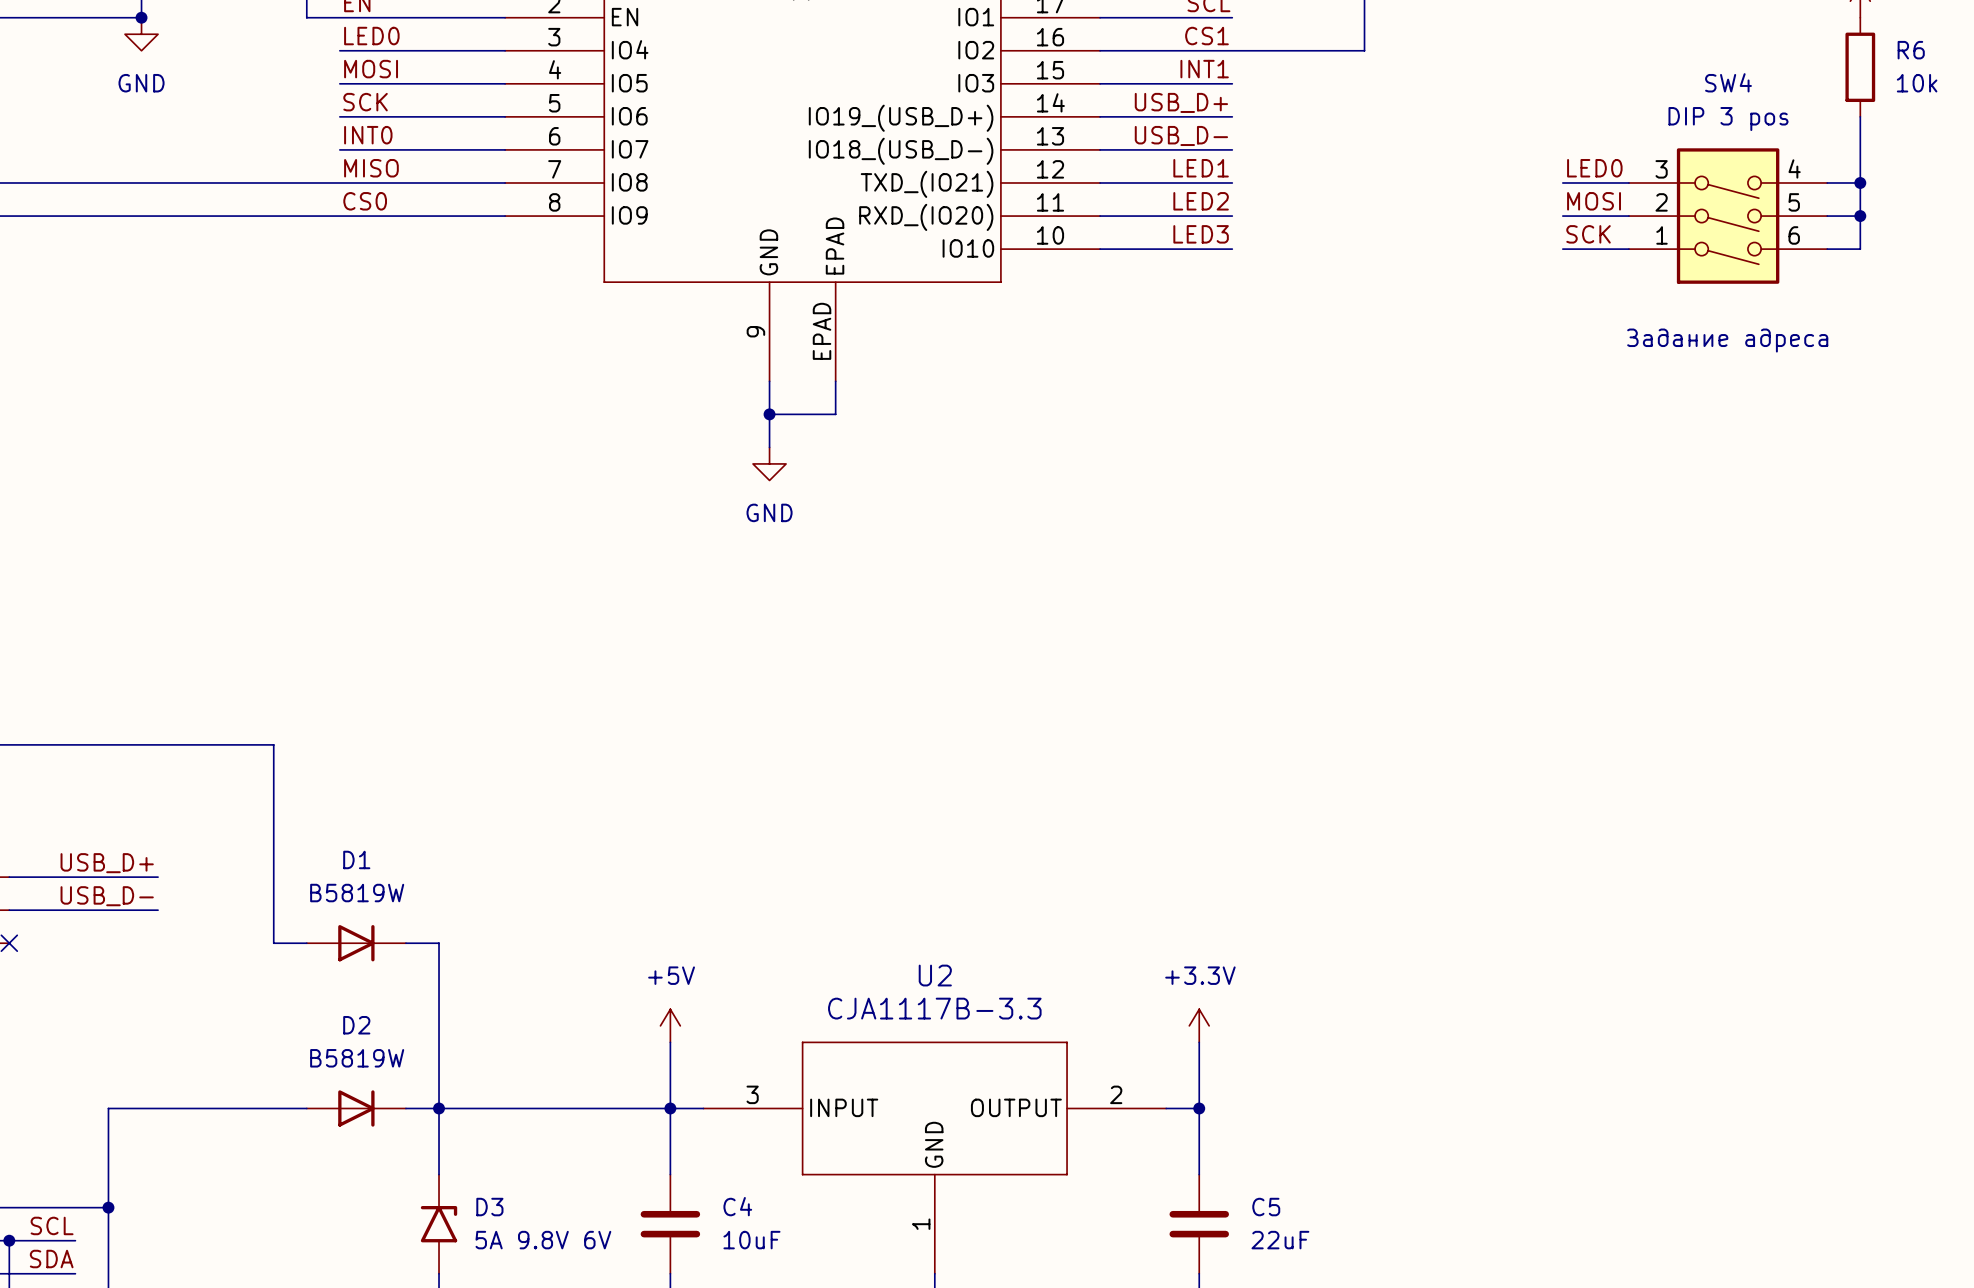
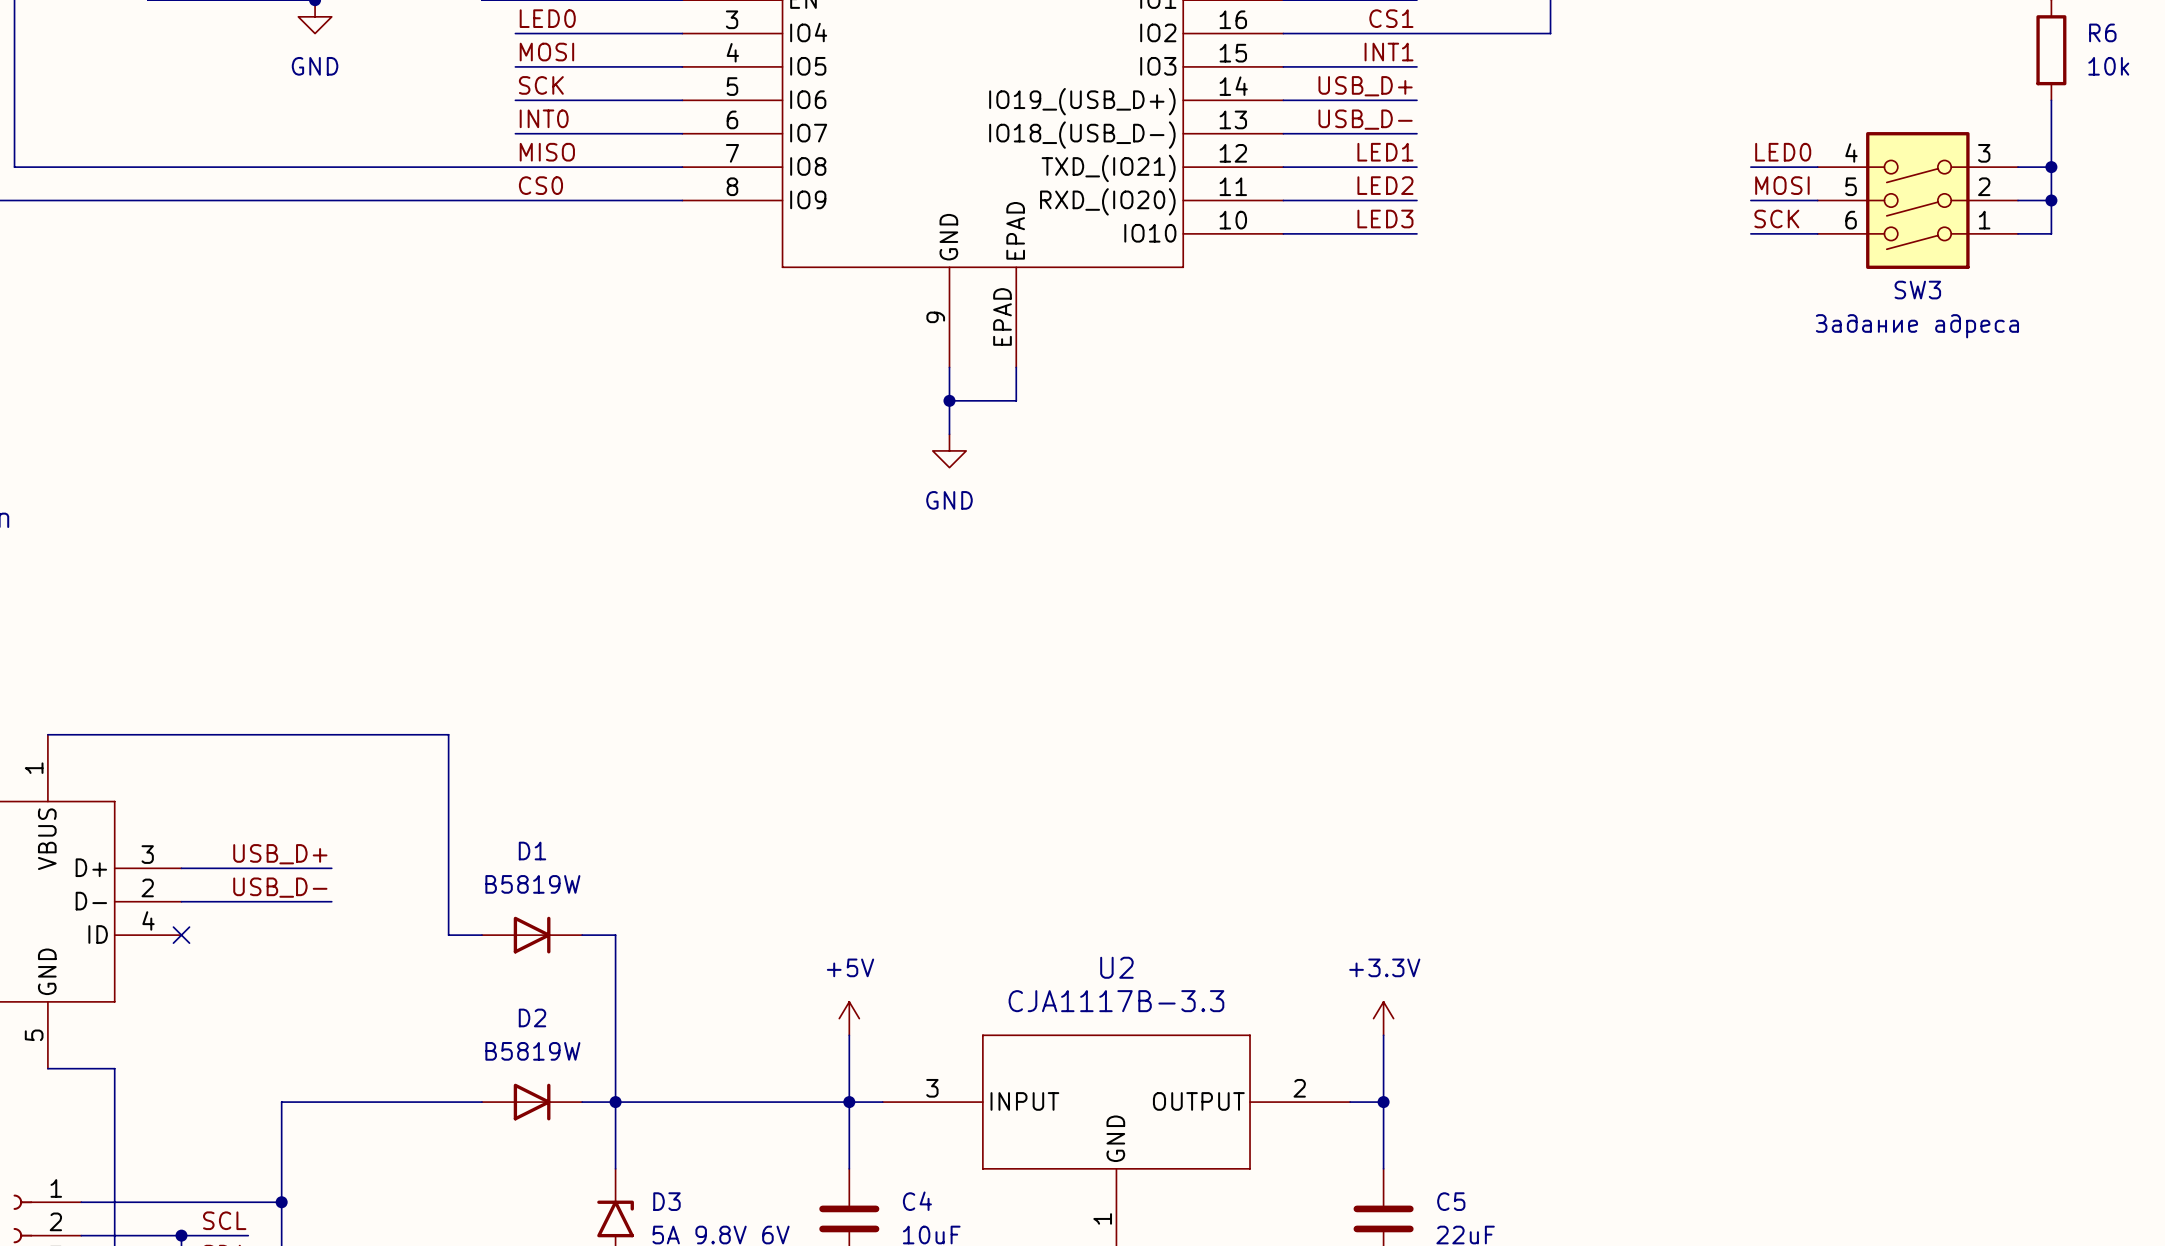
SW4: DIP 3 pos (1728, 216) -> none
SW3: none -> (1917, 200)

